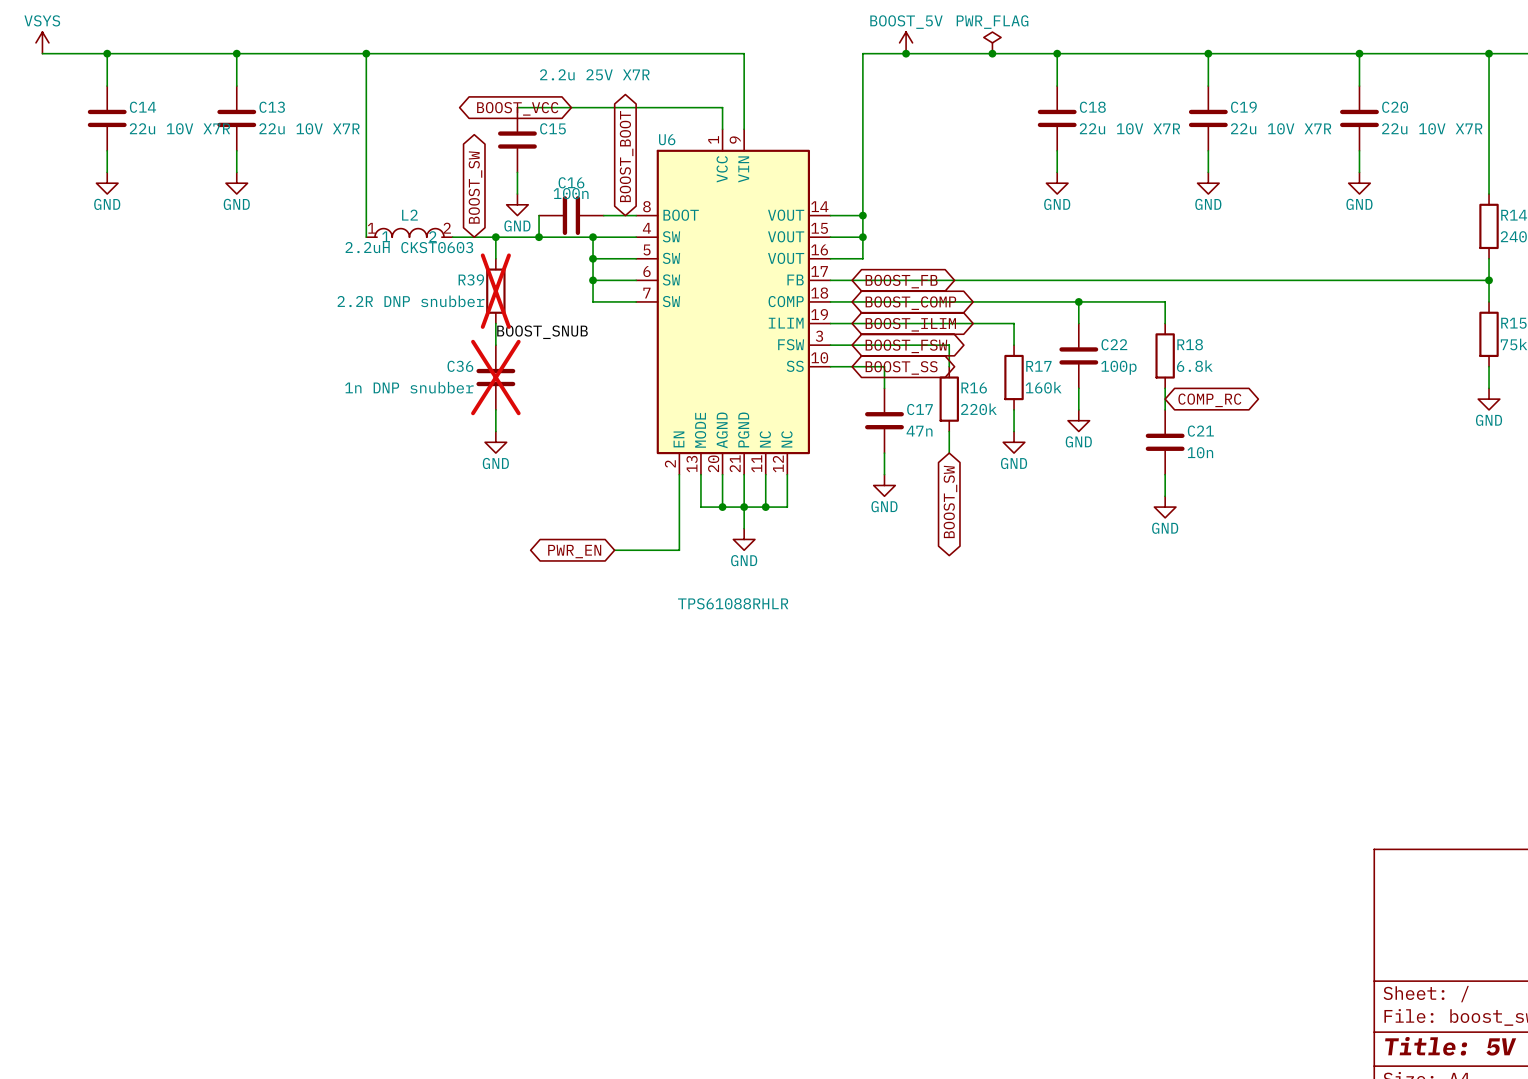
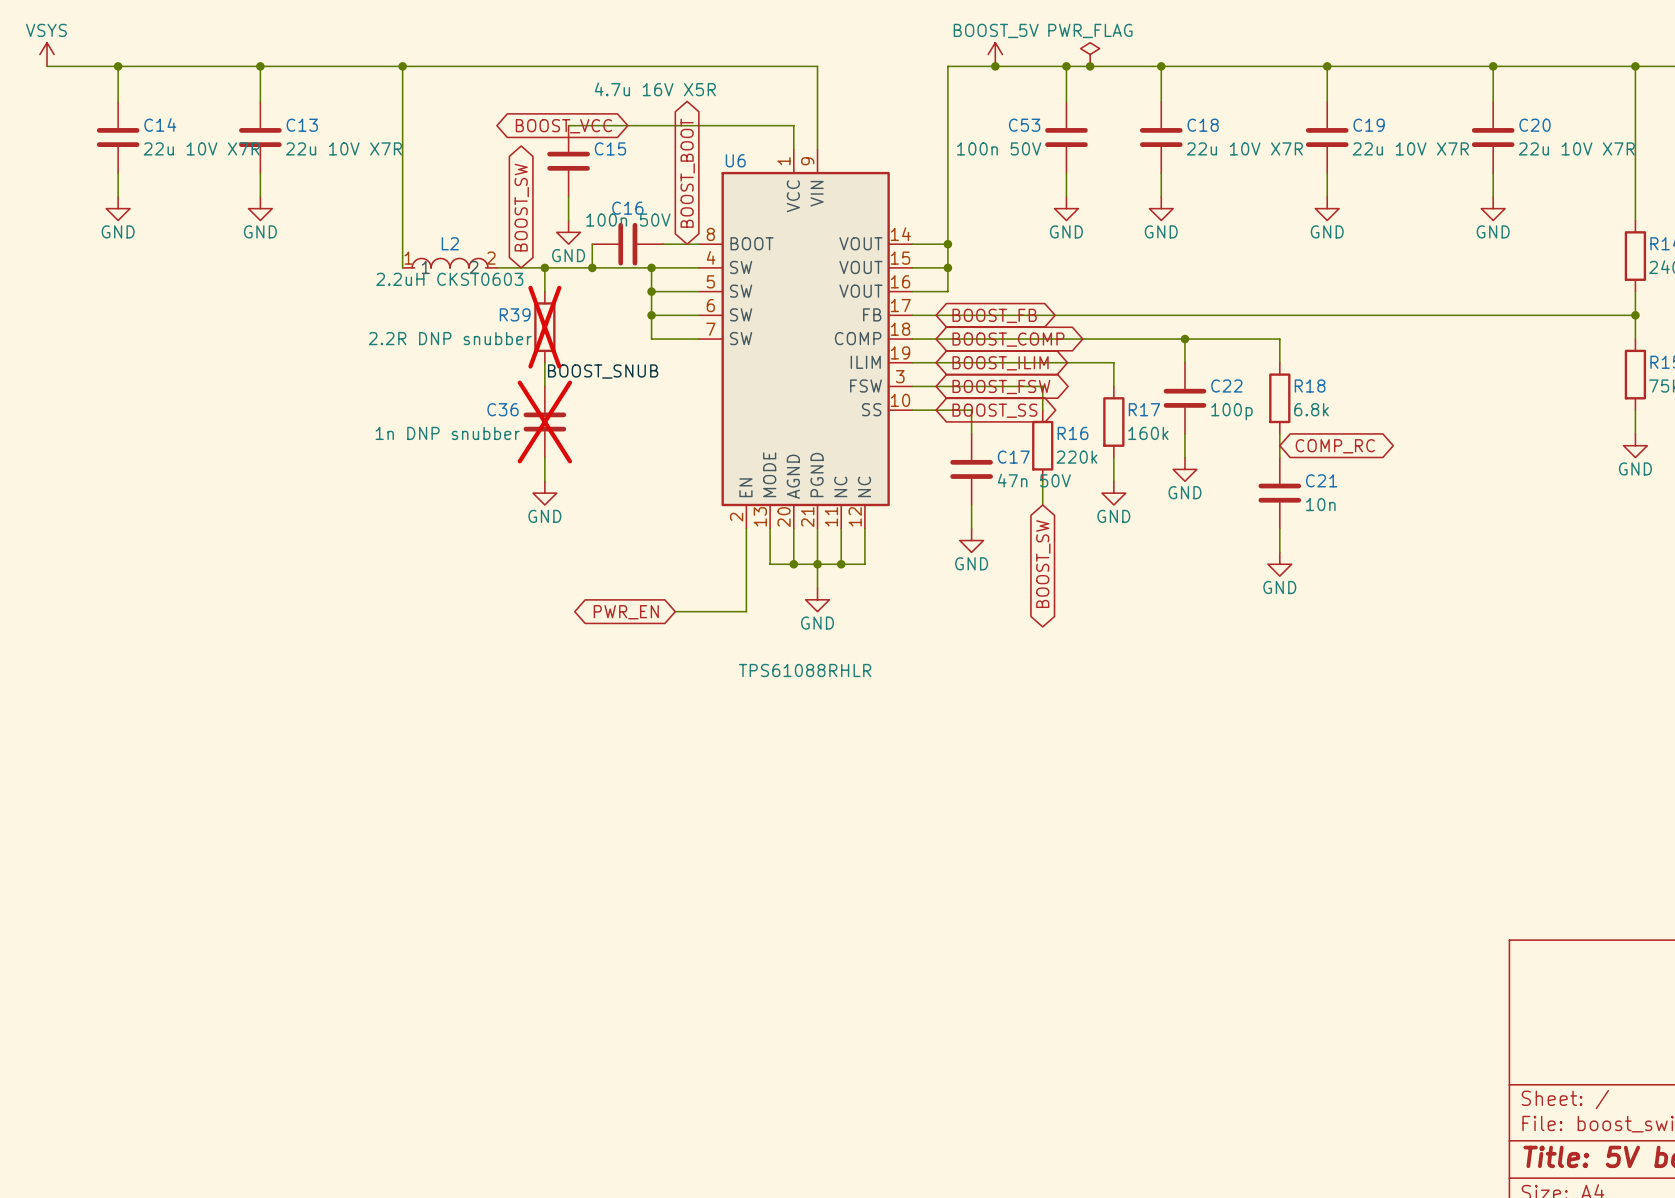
wire: none -> (1066, 66) (1066, 101)
junction: none -> (1066, 66)
C15 value: 2.2u 25V X7R (594, 74) -> 4.7u 16V X5R (655, 89)
C53: none -> 100n 50V (1066, 137)
wire: none -> (1066, 173) (1066, 196)
power symbol: none -> GND (1066, 208)
C16 value: 100n (571, 193) -> 100n 50V (628, 220)
C17 value: 47n (919, 431) -> 47n 50V (1034, 480)

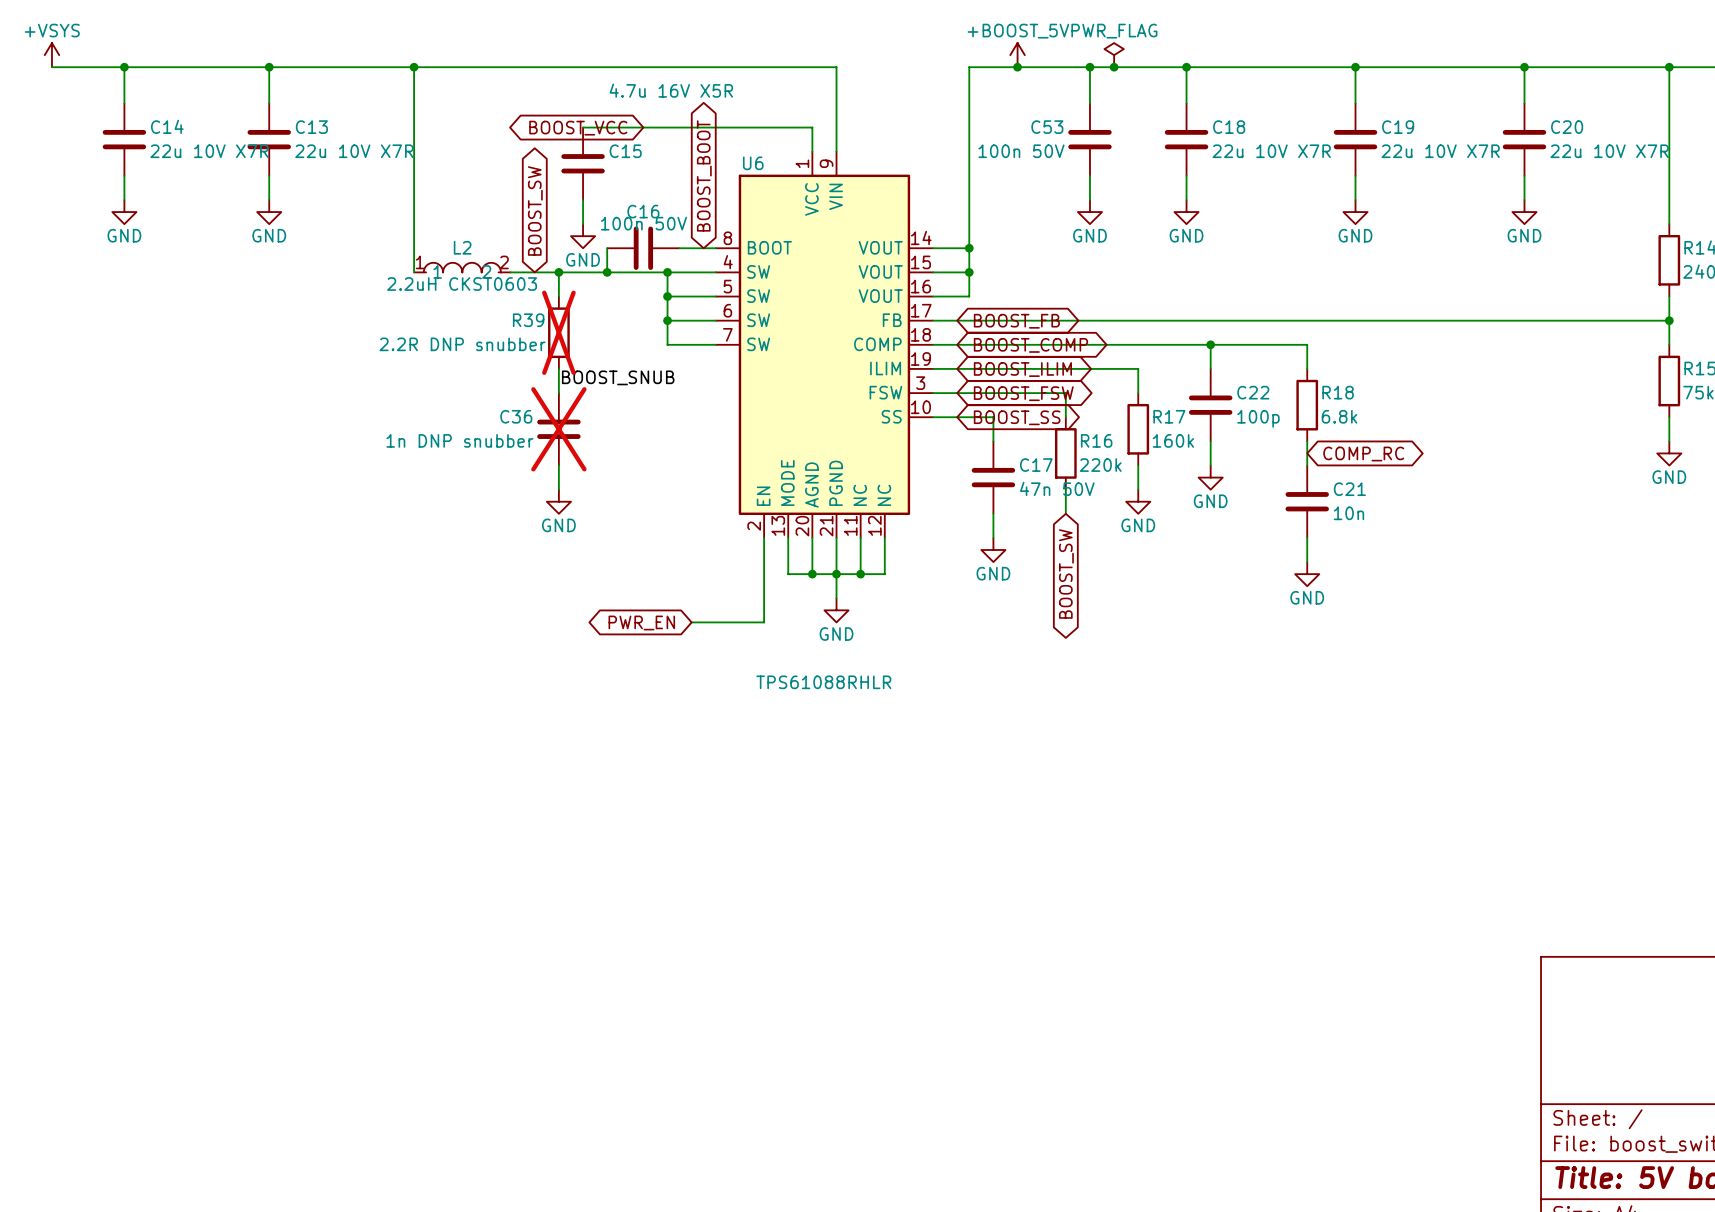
power symbol: VSYS (47, 54) -> +VSYS (51, 55)
power symbol: BOOST_5V (995, 54) -> +BOOST_5V (1017, 55)

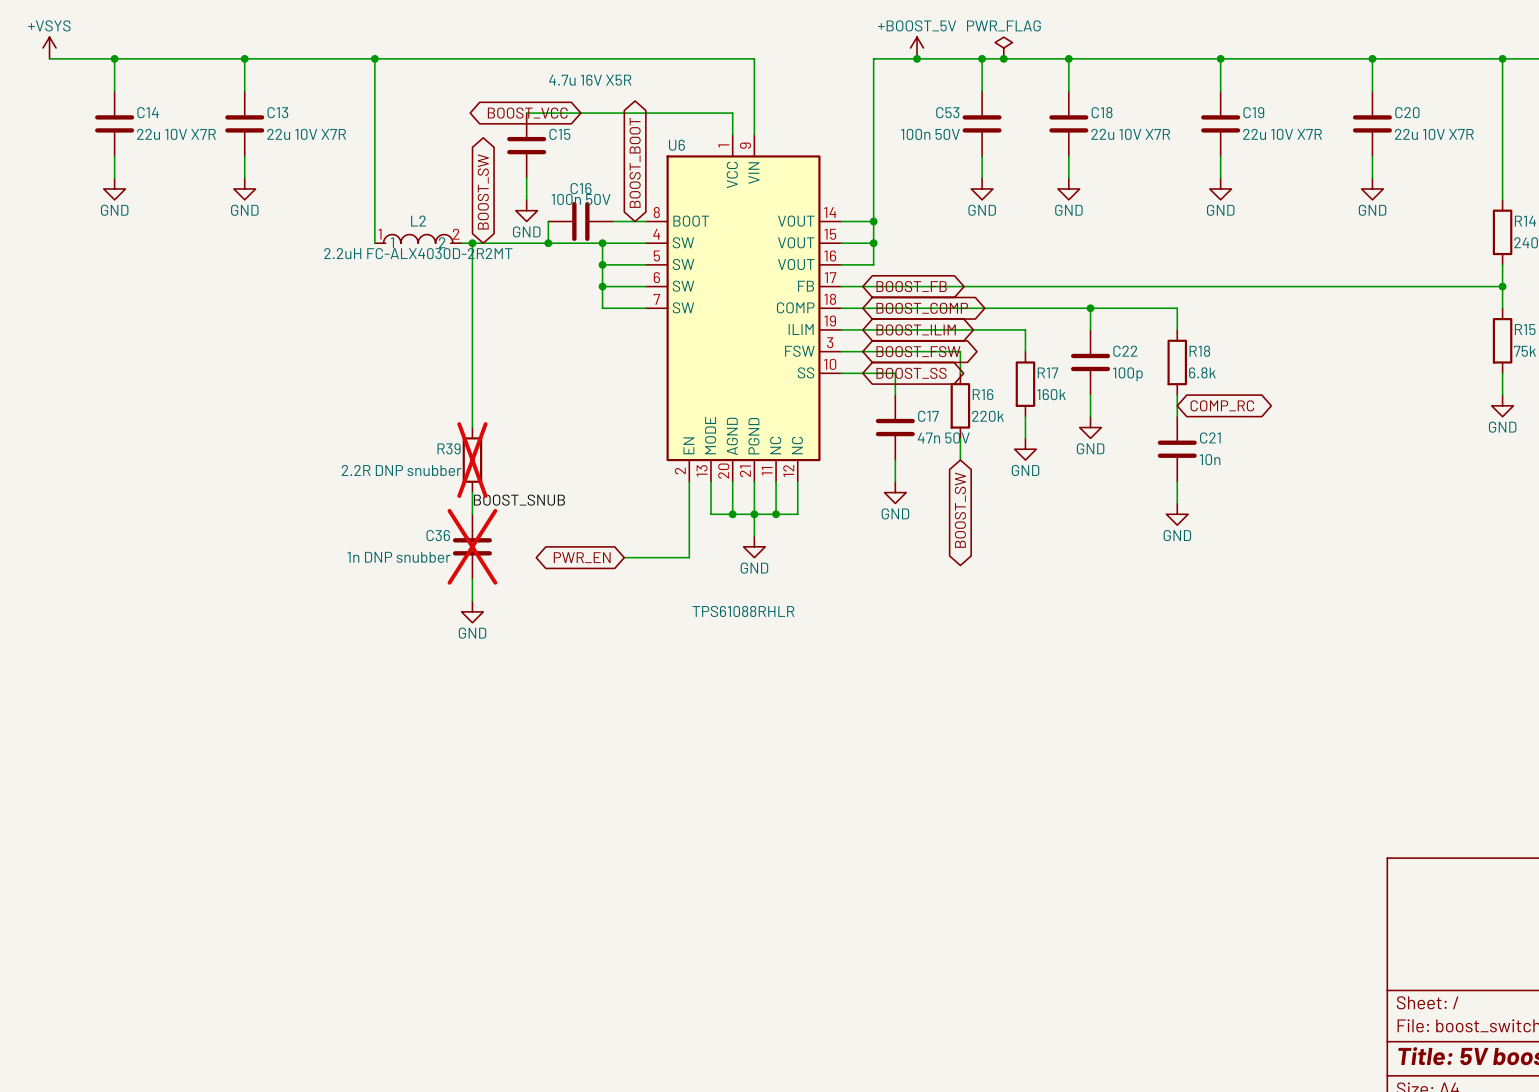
wire: none -> (472, 243) (472, 427)
wire: (558, 272) (558, 296) -> none
junction position: (558, 272) -> (472, 243)
L2 value: 2.2uH CKST0603 (462, 284) -> 2.2uH FC-ALX4030D-2R2MT (418, 253)
R39 position: (558, 332) -> (472, 460)
wire: (558, 368) (558, 393) -> none
label position: BOOST_SNUB (618, 377) -> BOOST_SNUB (519, 500)
C36 position: (558, 429) -> (472, 546)
wire: (558, 465) (558, 489) -> (472, 492) (472, 514)
power symbol position: GND (558, 501) -> GND (472, 611)
wire: none -> (472, 579) (472, 601)

